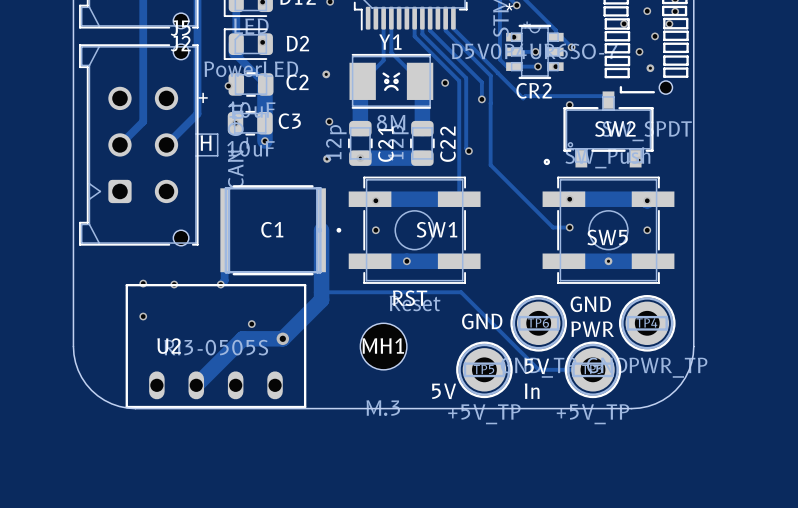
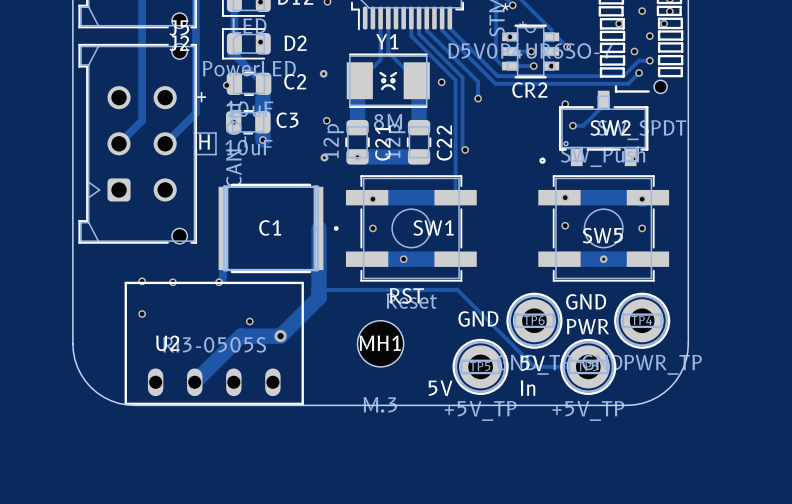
via: none -> (649, 60)
via: (650, 68) -> none
track: (497, 73) (523, 98) (525, 96) (604, 96) (608, 100) -> (493, 72) (497, 76) (623, 76) (638, 60) (649, 60)
via: none -> (639, 73)
track: (490, 75) (490, 103) -> (486, 75) (495, 83) (628, 83) (639, 73)
track: none -> (603, 99) (603, 105) (583, 125) (572, 125)
track: (490, 103) (490, 165) (553, 227) (569, 227) -> none
via: none -> (572, 125)

